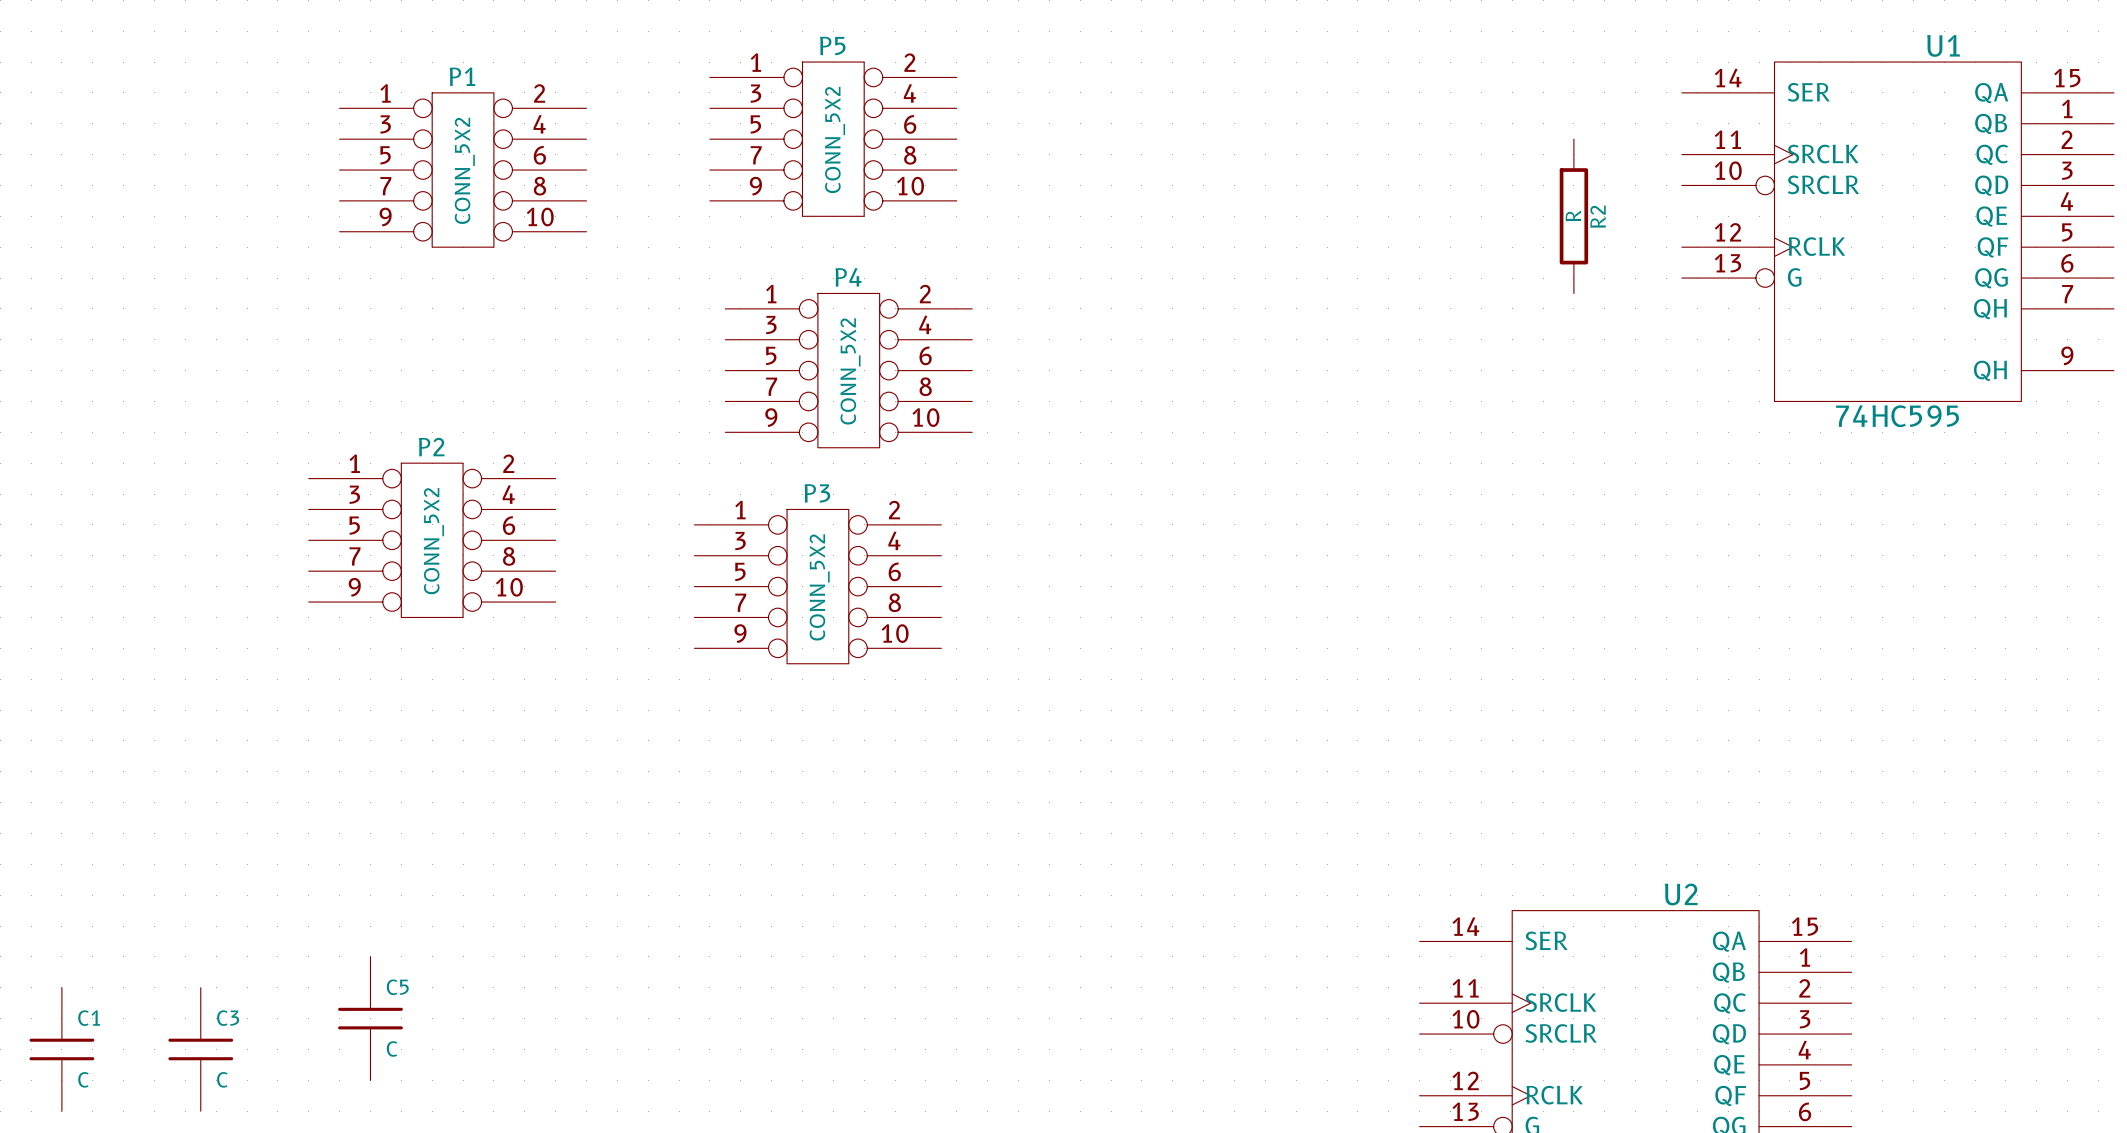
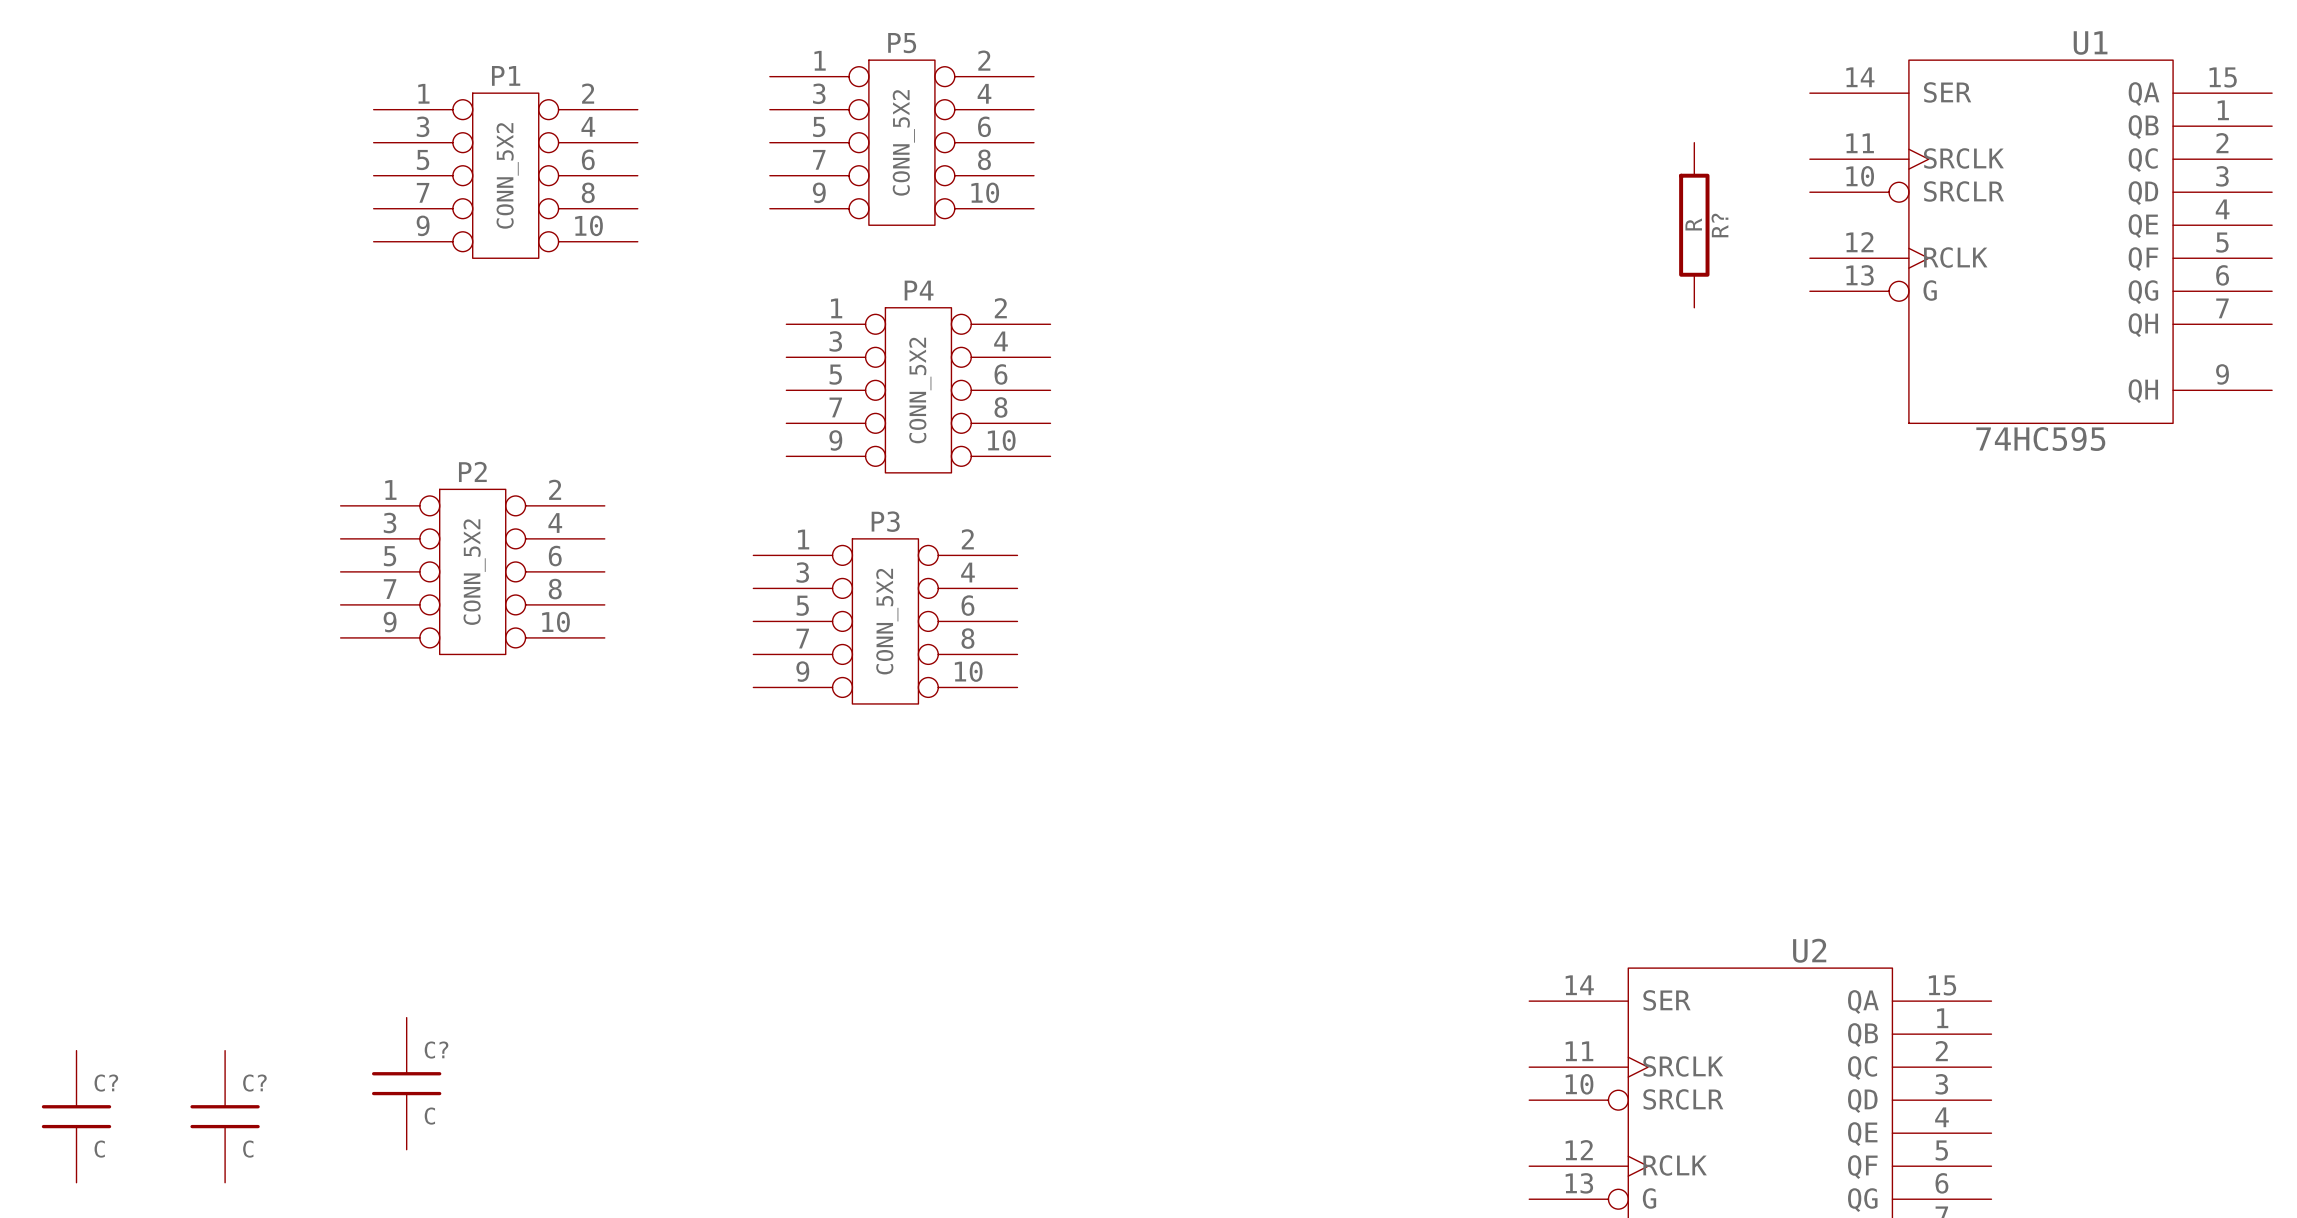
R2 name: R2 (1598, 216) -> R? (1719, 225)
C5 name: C5 (397, 987) -> C? (436, 1050)
C1 name: C1 (89, 1018) -> C? (106, 1083)
C3 name: C3 (228, 1018) -> C? (254, 1083)

